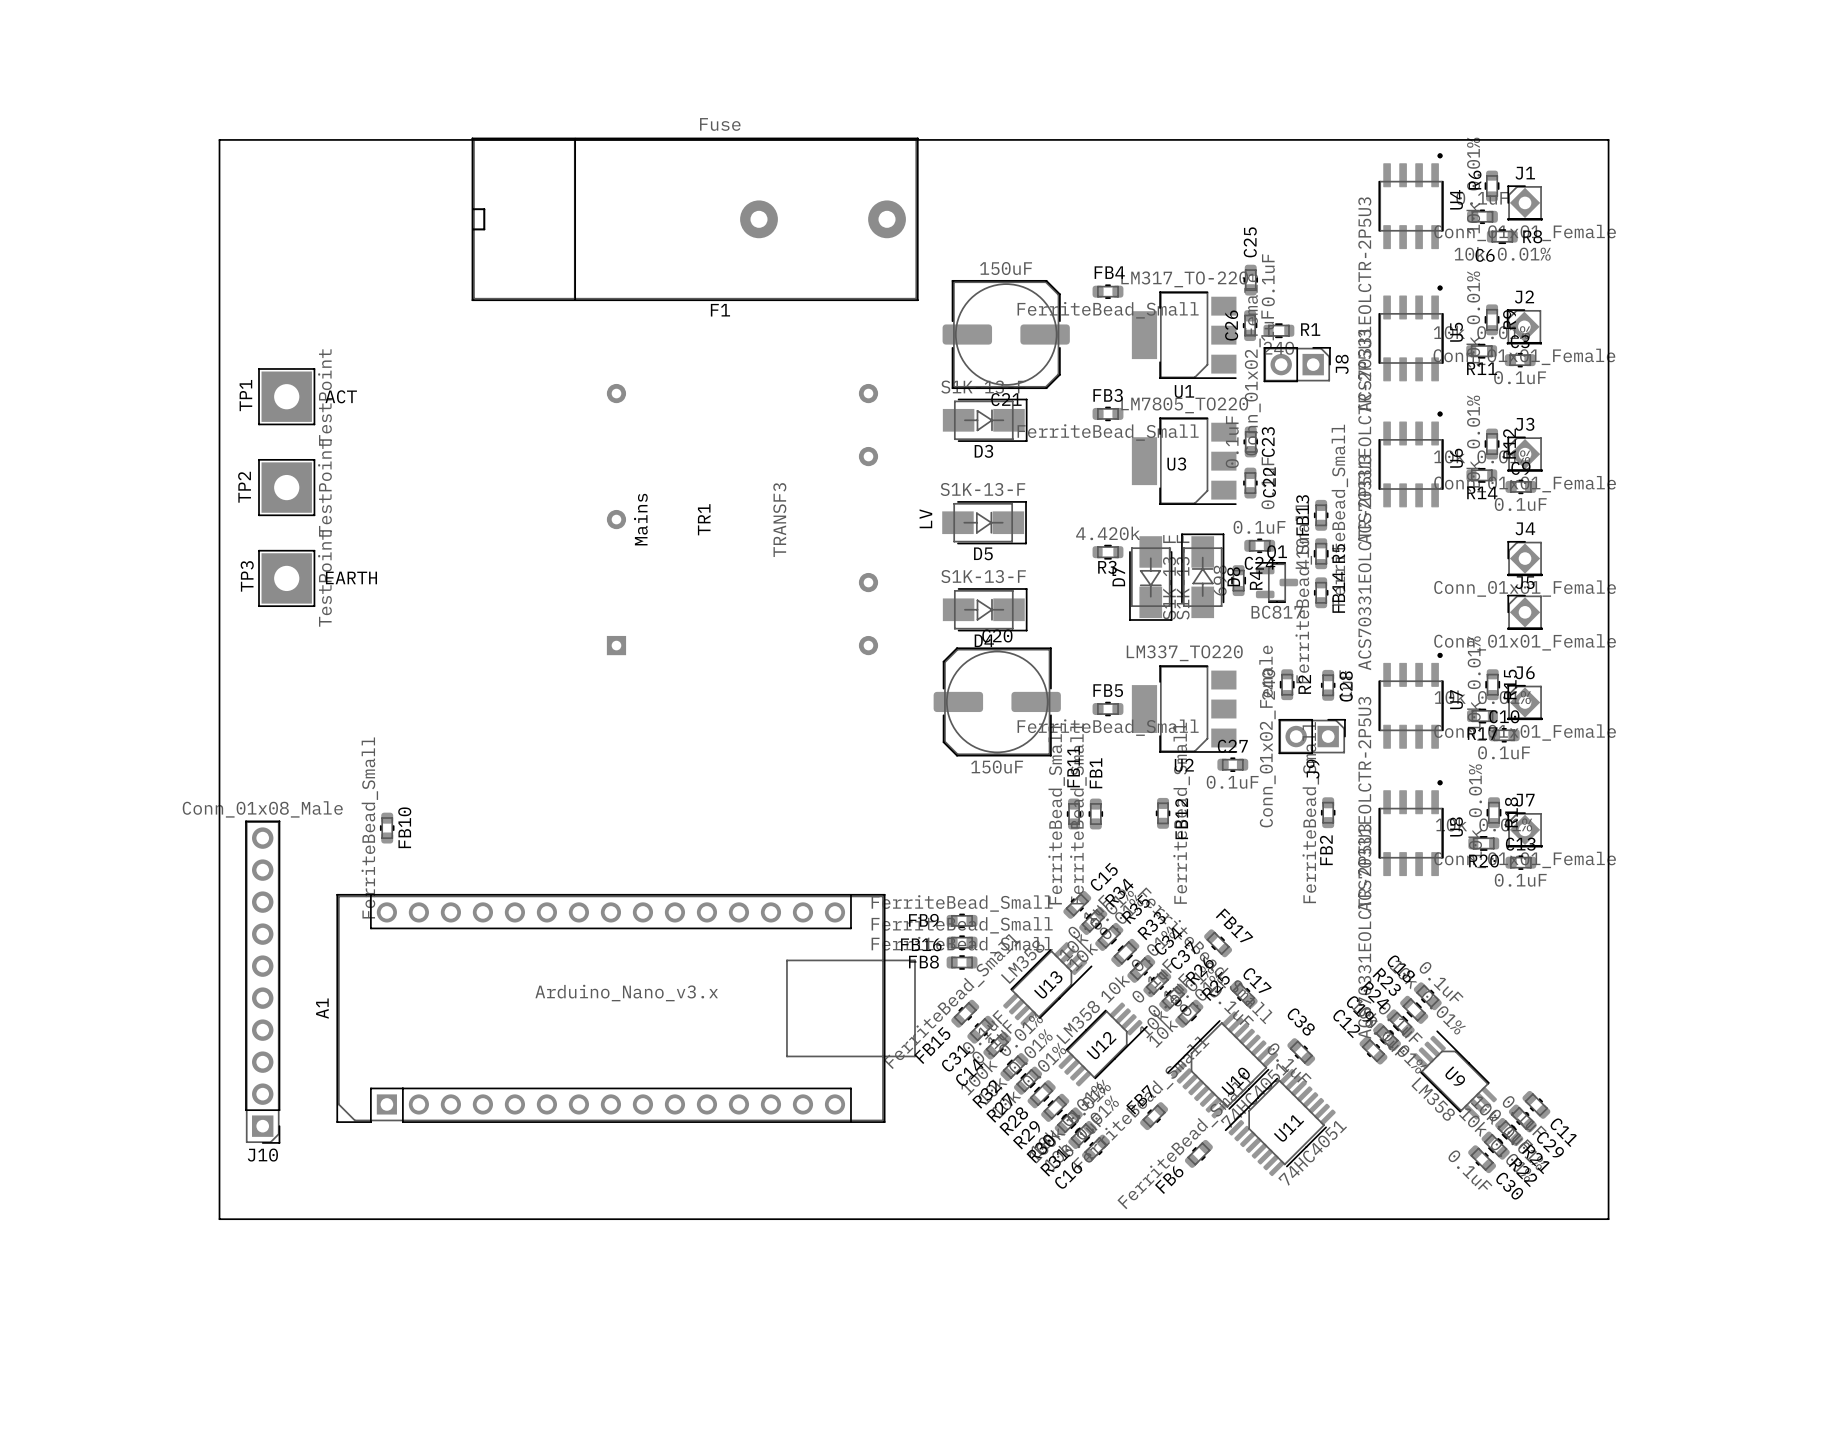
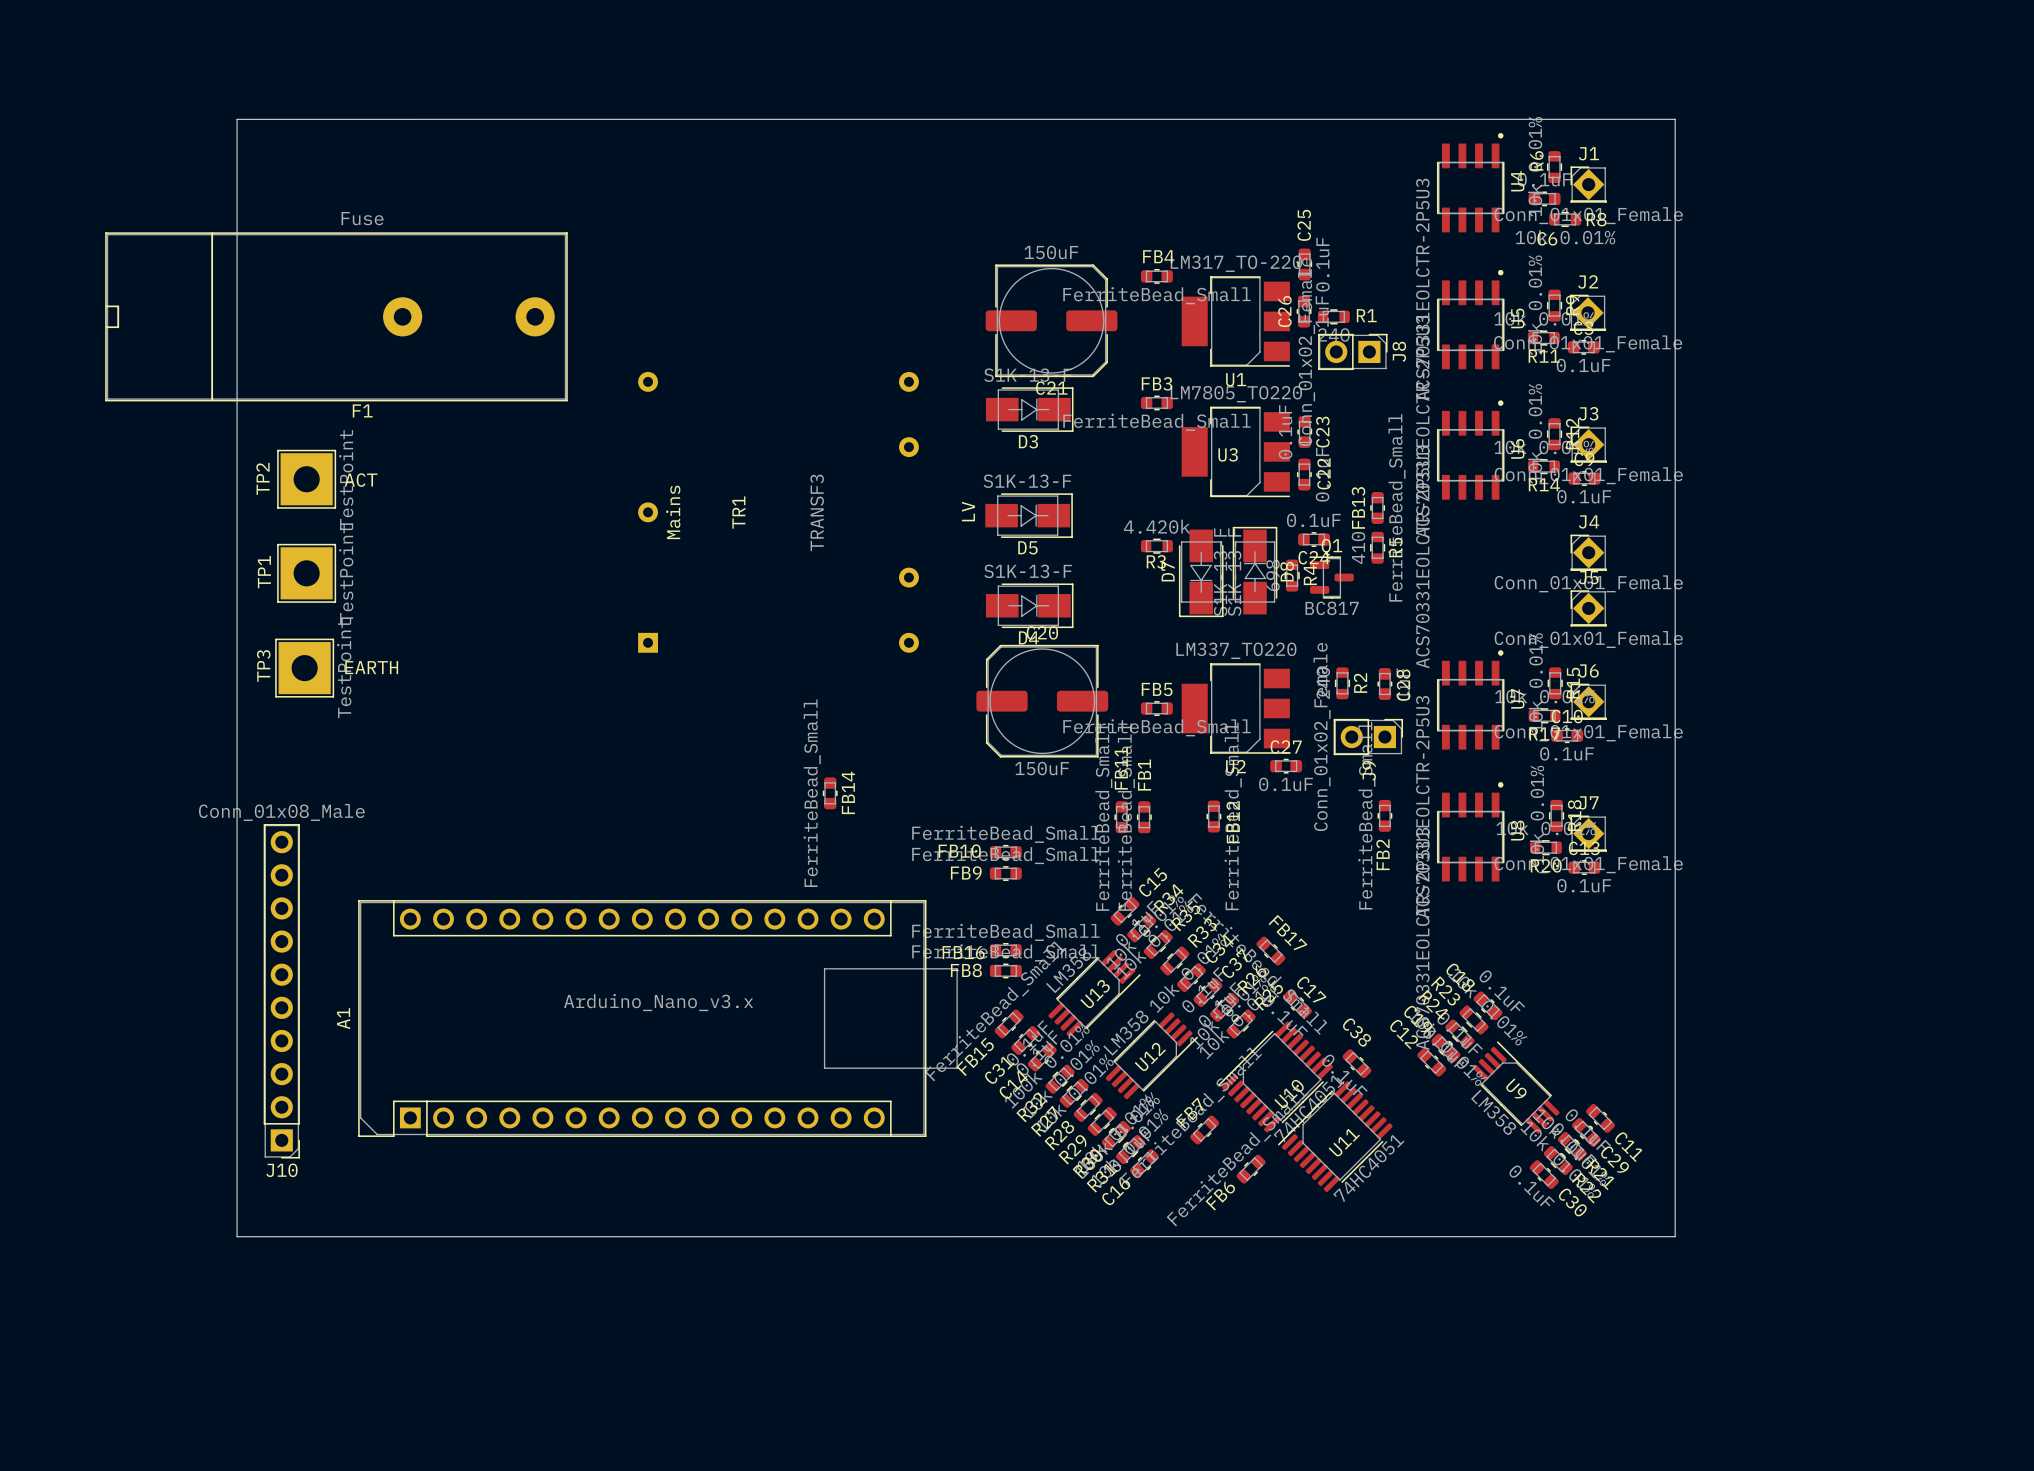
F1 position: (695, 219) -> (336, 316)
TP1: TestPoint (286, 396) -> none
text position: ACT (341, 396) -> ACT (361, 480)
TP3 name: TP3 (247, 576) -> TP1 (264, 572)
text position: EARTH (351, 577) -> EARTH (371, 667)
FB14 position: (1321, 592) -> (830, 793)
TP3: none -> TestPoint (304, 668)
FB10 name position: FB10 (404, 827) -> FB10 (959, 851)
FB10 rotation: 0° (387, 828) -> 90° clockwise (1005, 852)
FB10 position: (387, 828) -> (1005, 852)
FB9 position: (962, 920) -> (1005, 873)

